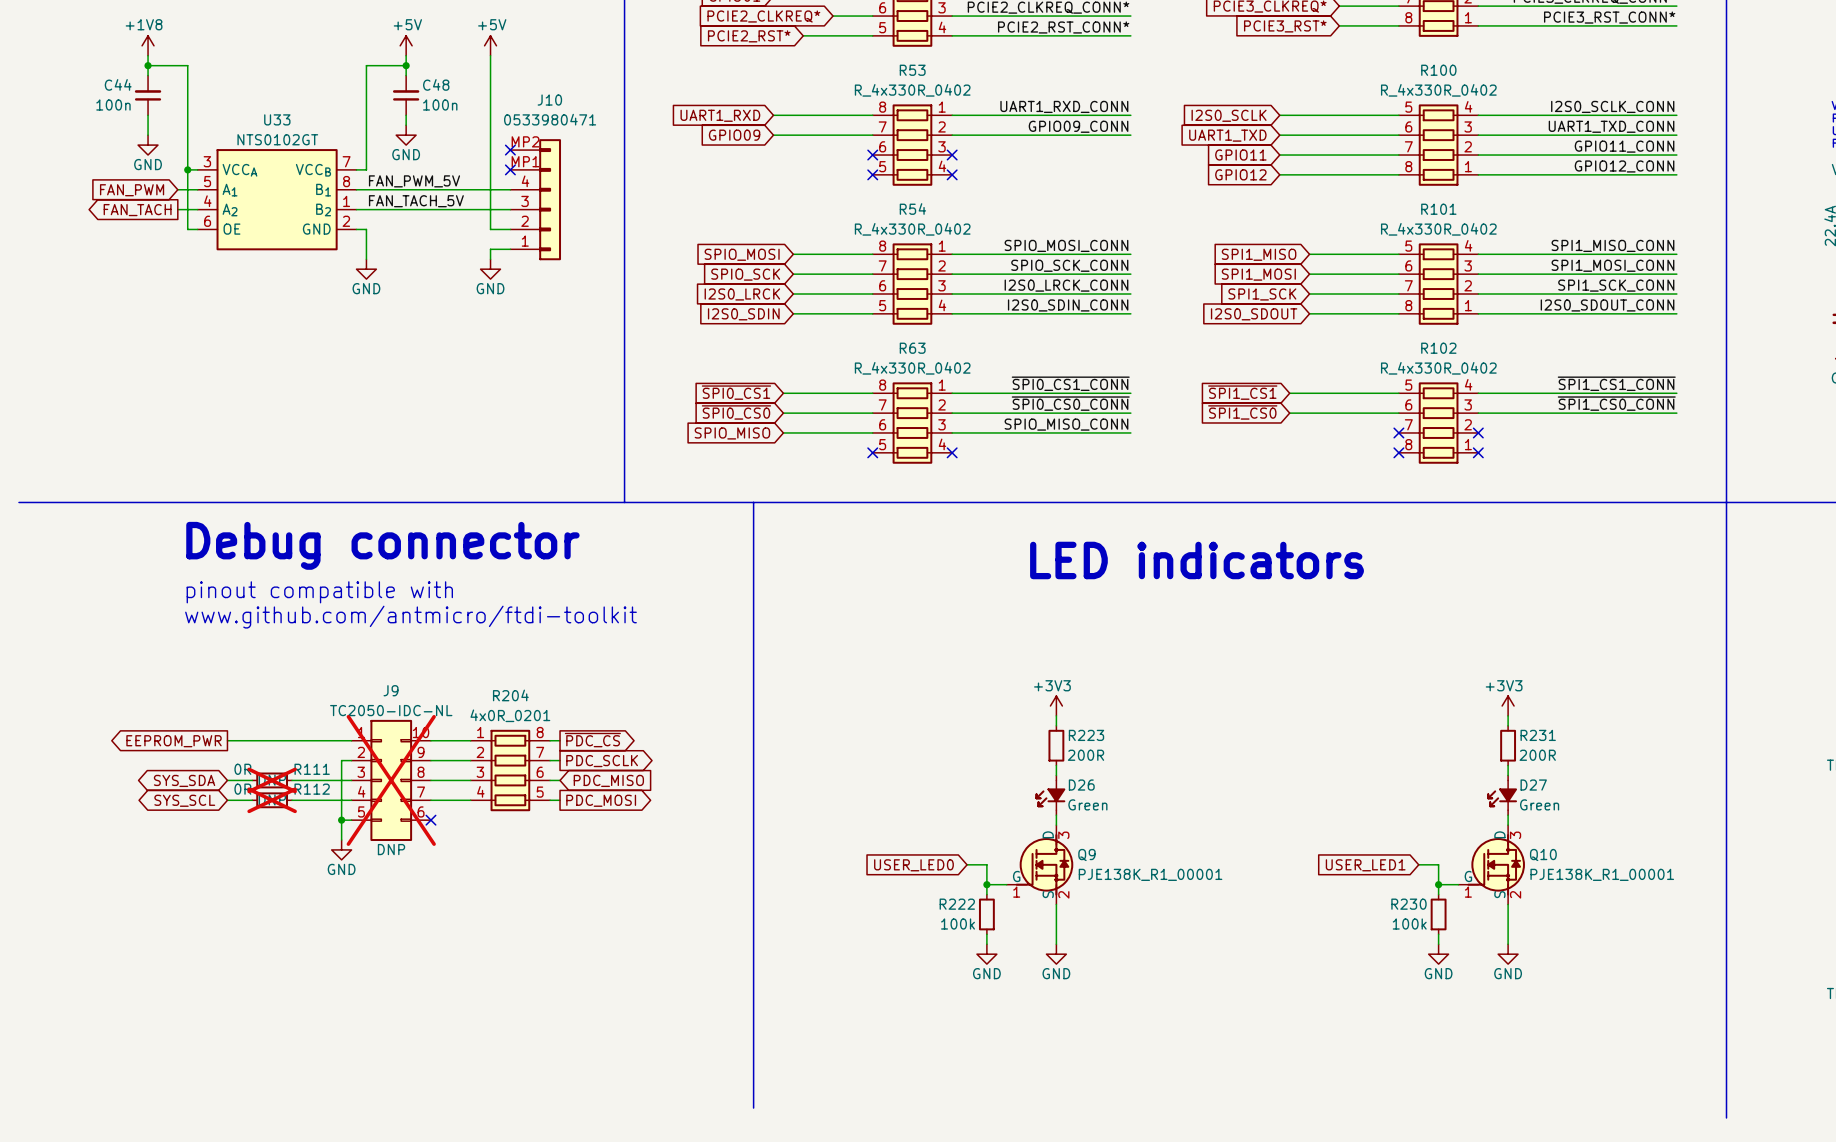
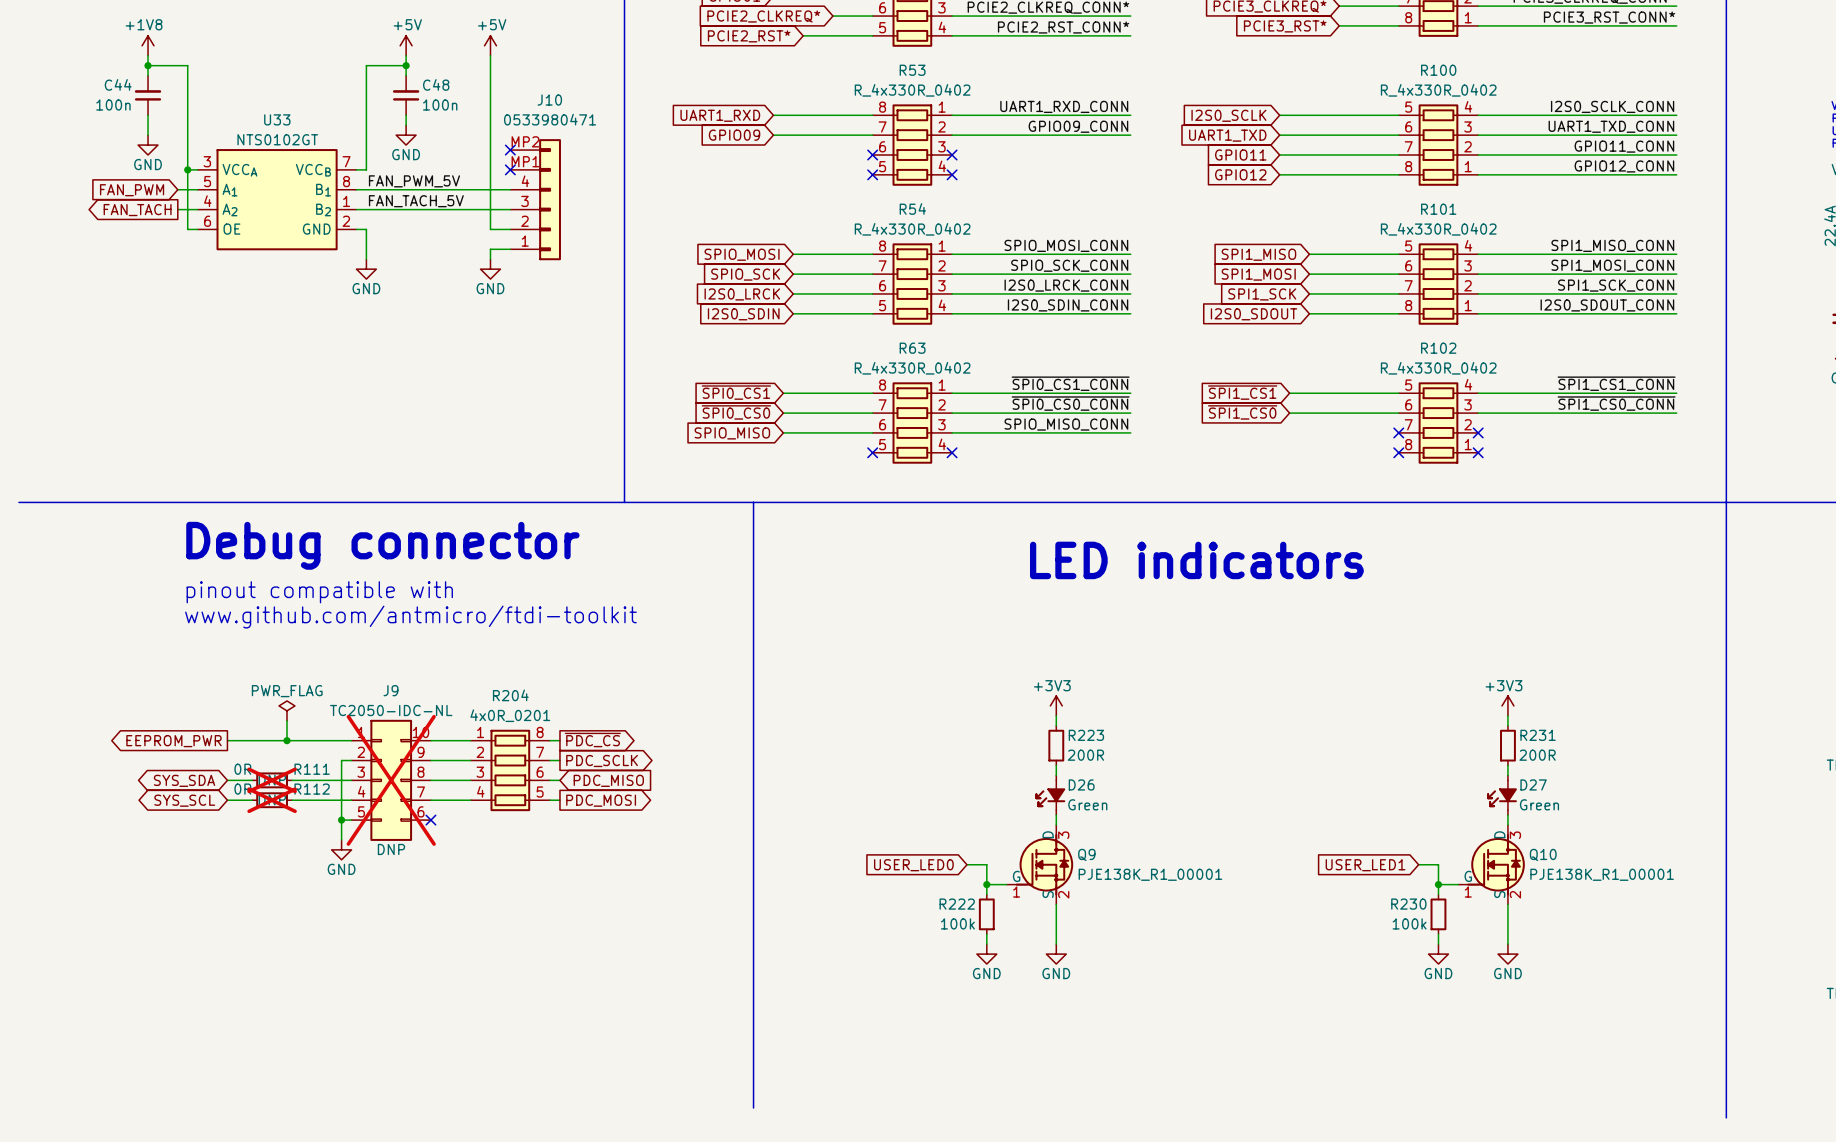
power symbol: none -> PWR_FLAG (286, 710)
wire: none -> (286, 720) (286, 740)
junction: none -> (286, 740)

